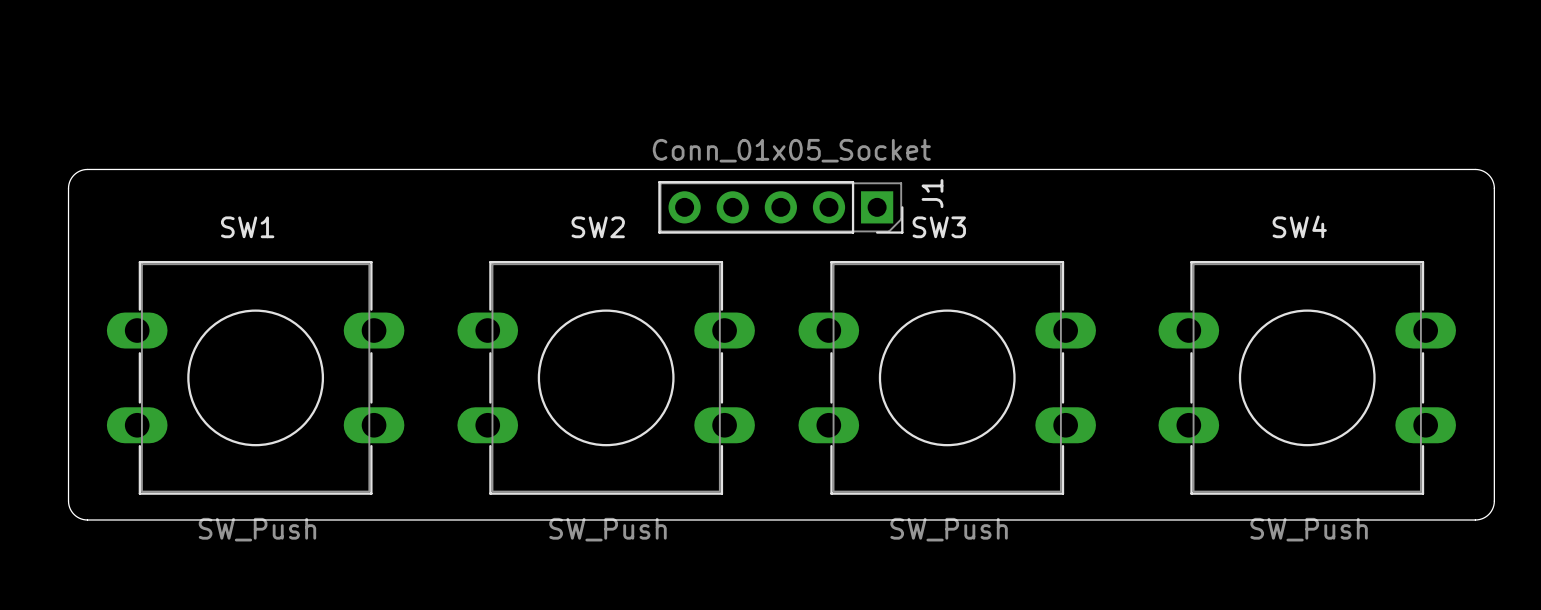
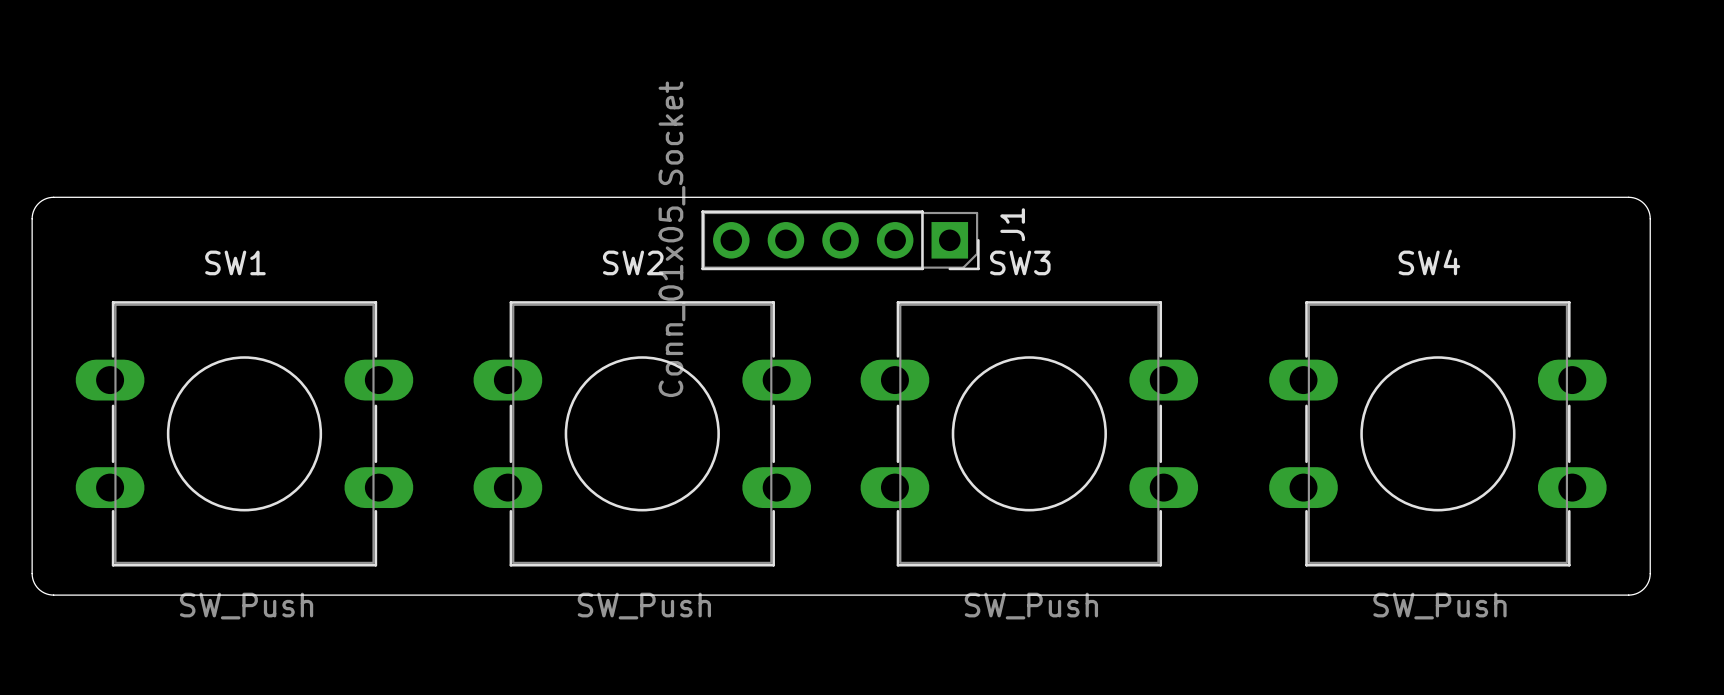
J1 value rotation: 0° (791, 150) -> 90° counterclockwise (671, 239)

